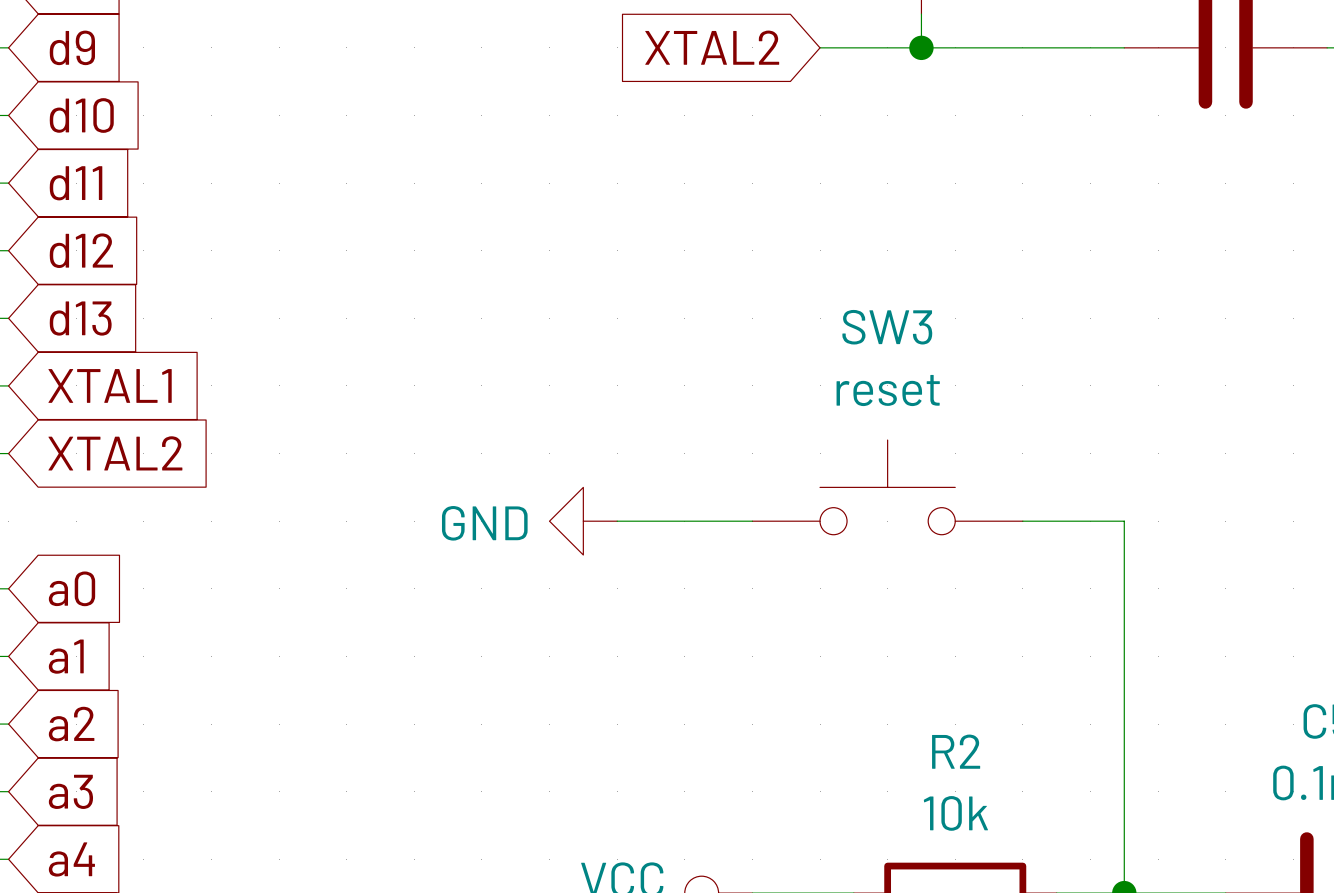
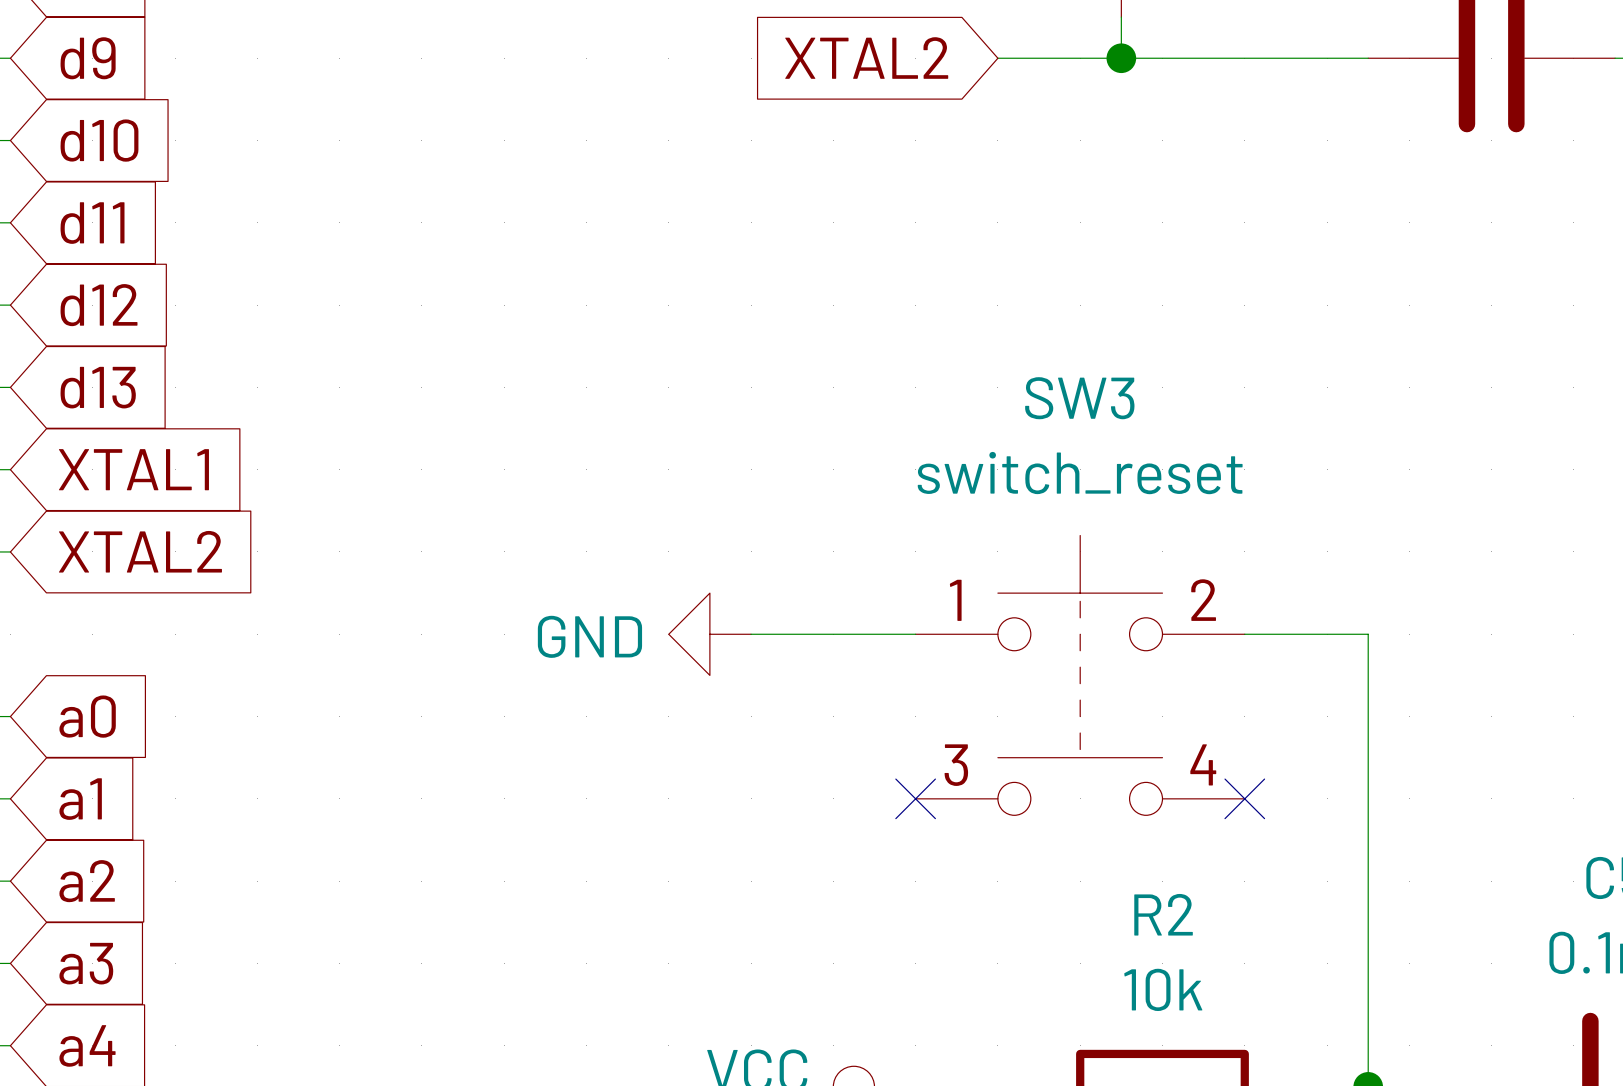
SW3 value: reset (888, 390) -> switch_reset (1080, 473)
SW3 symbol: [752, 440, 1023, 535] -> [915, 535, 1245, 816]
no-connect mark: none -> (915, 798)
no-connect mark: none -> (1244, 798)

